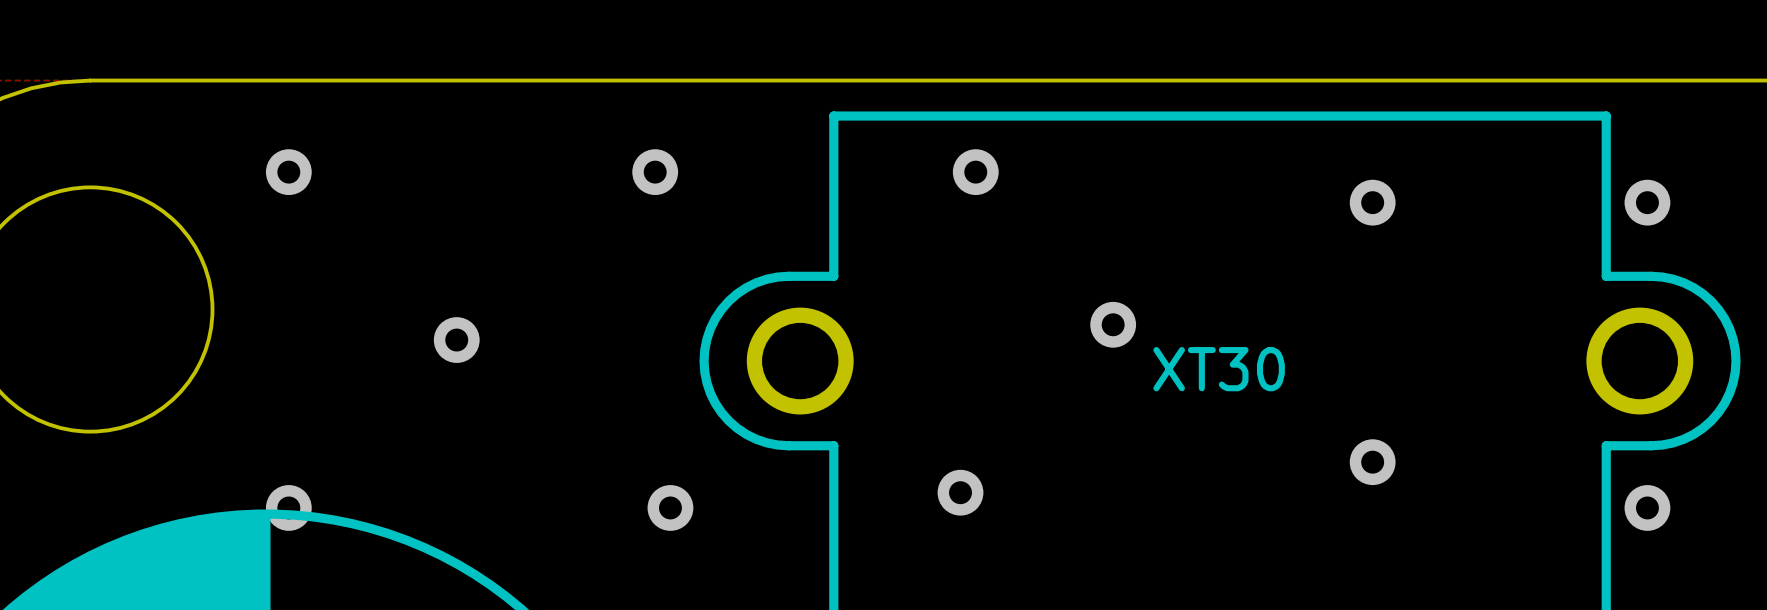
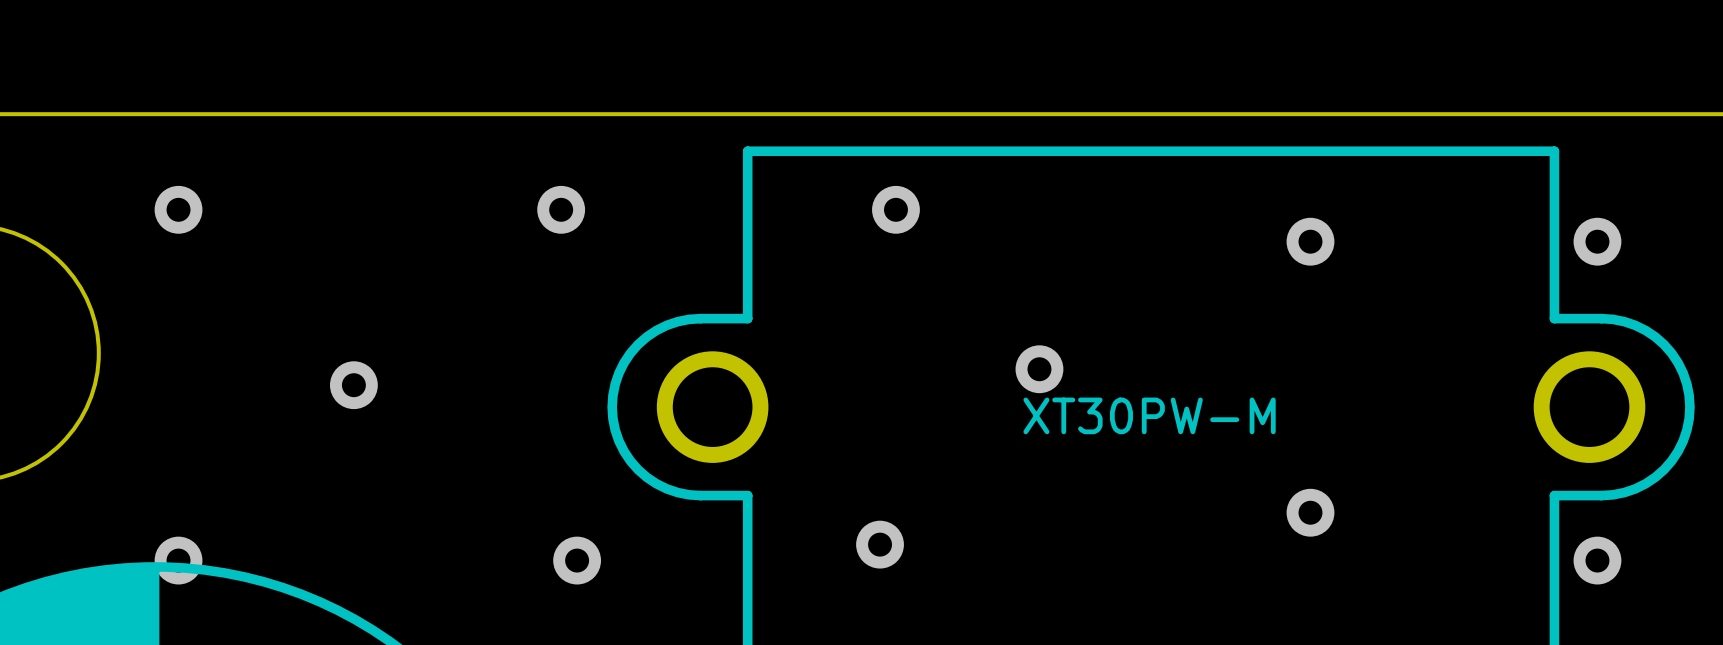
XT30 name: XT30 (1219, 369) -> XT30PW-M (1149, 415)

